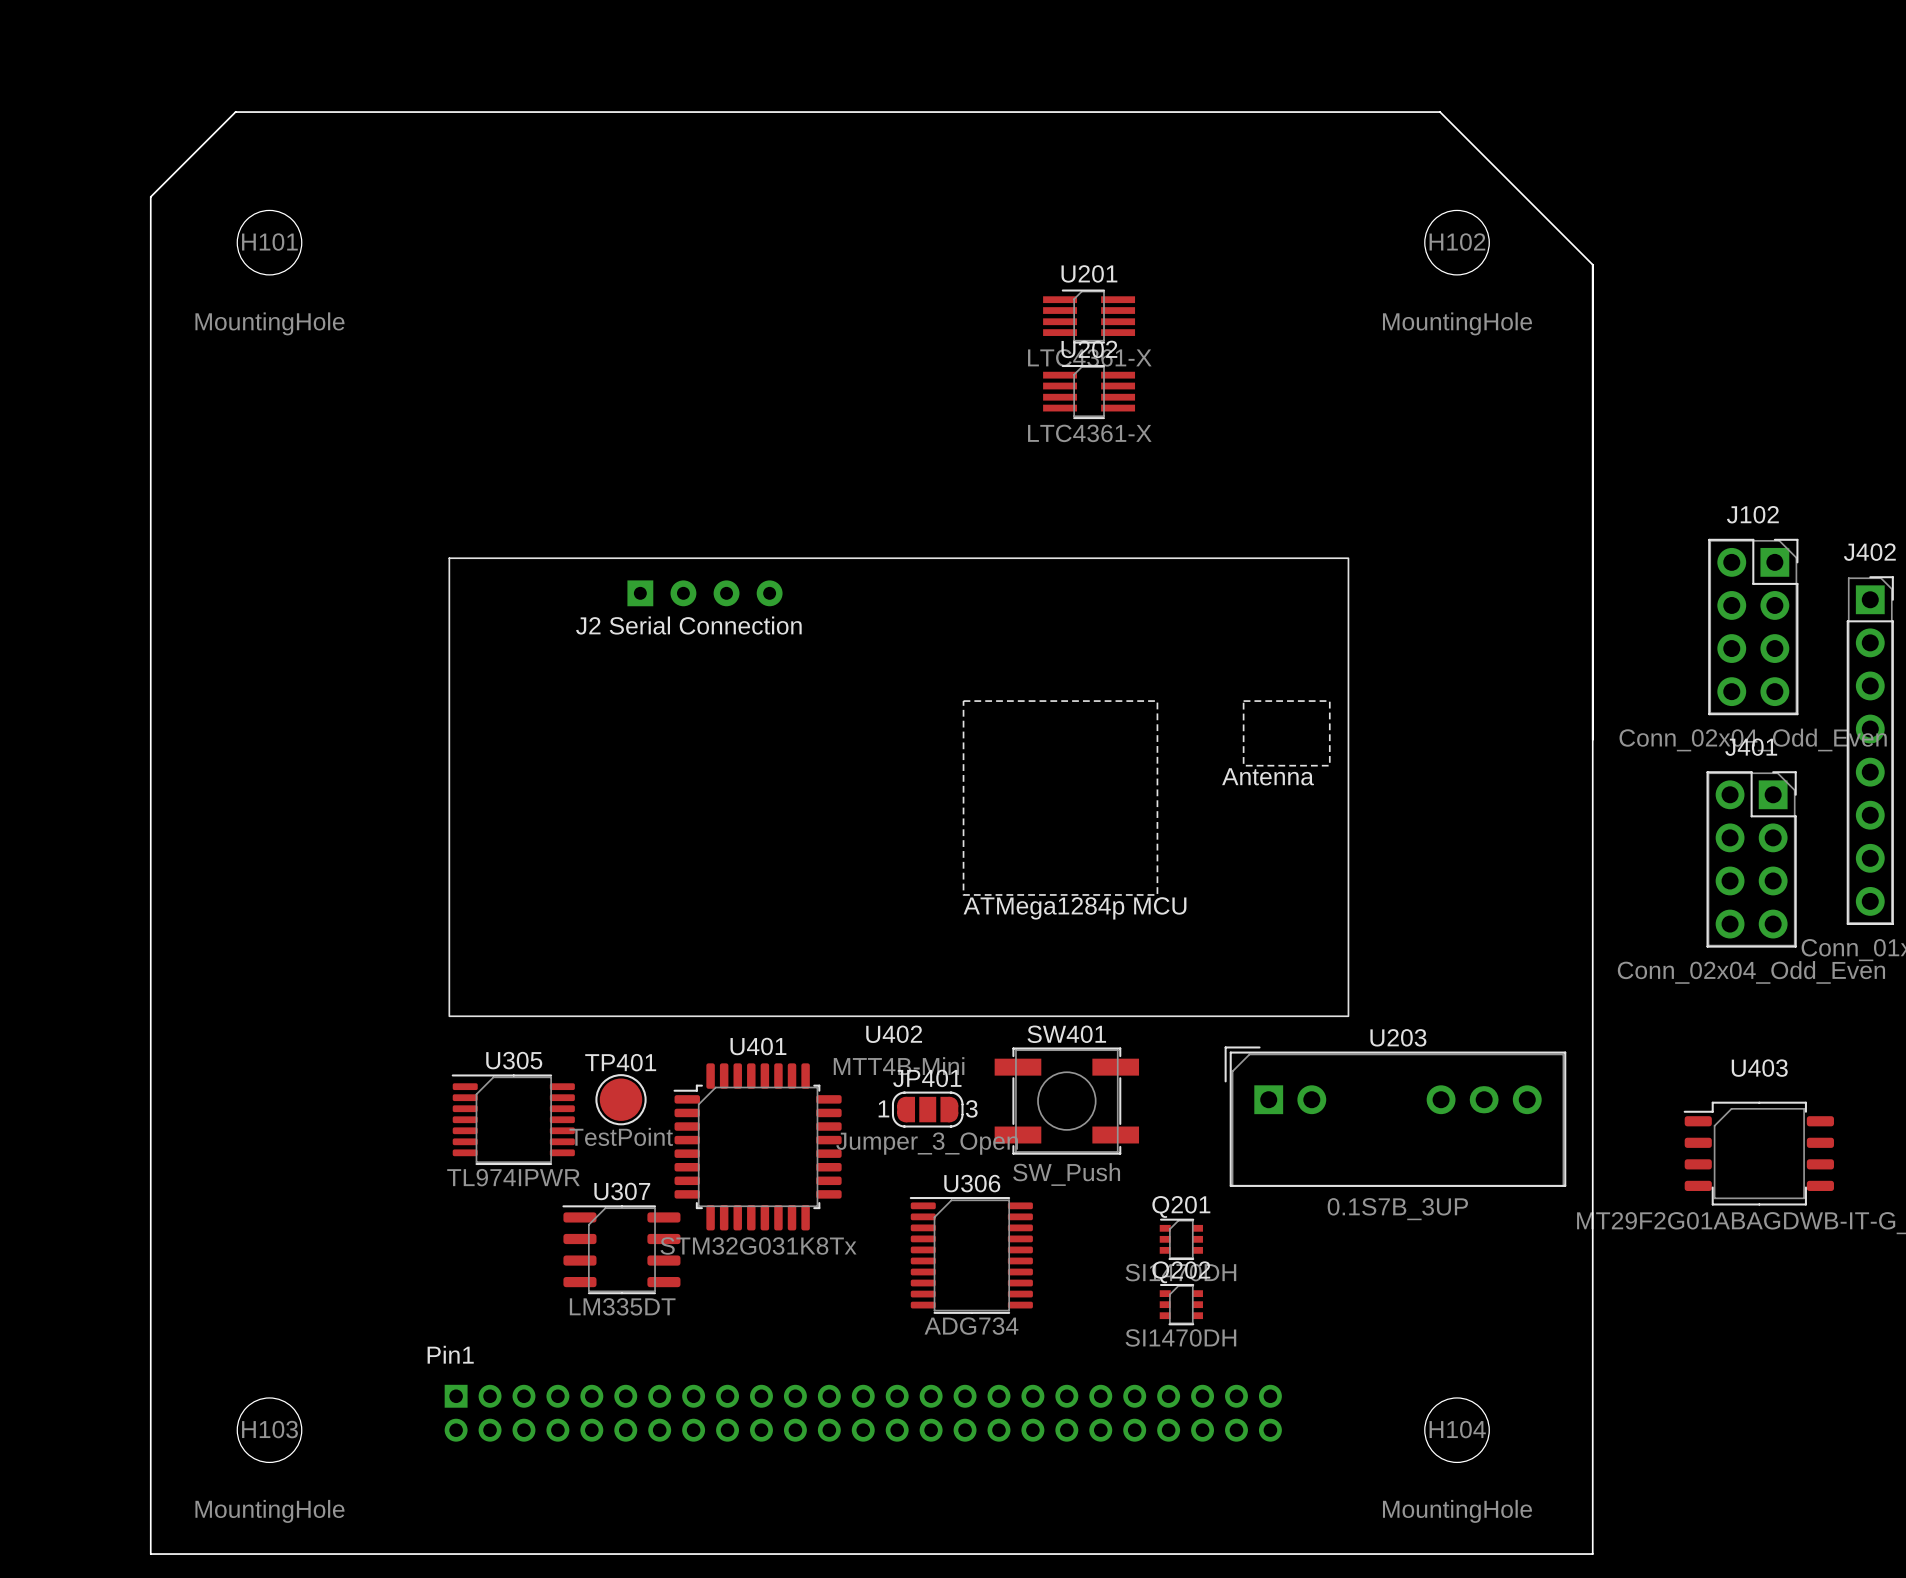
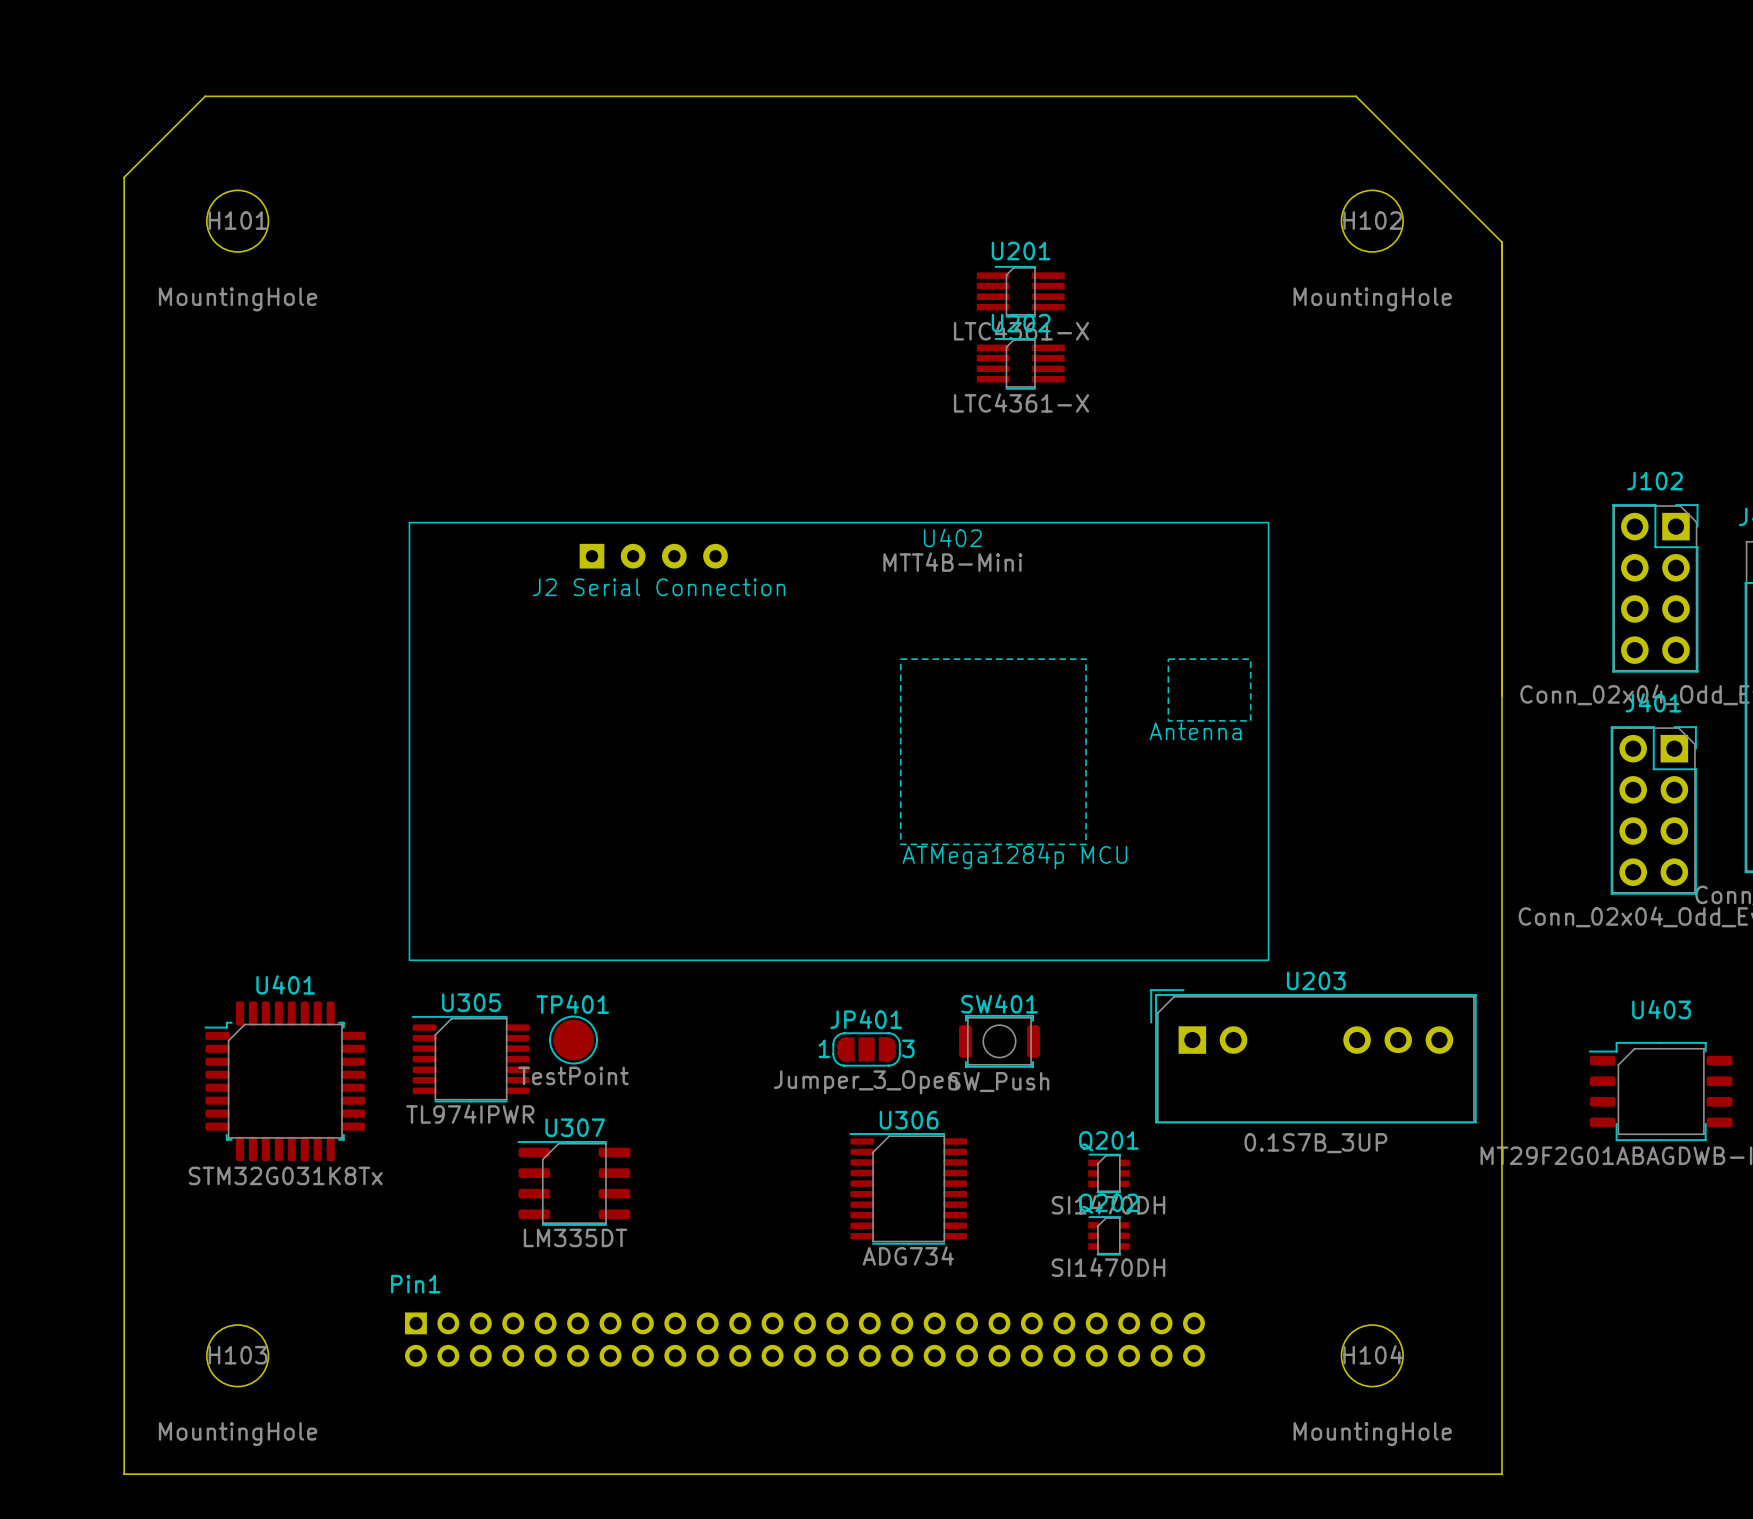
U402 name position: U402 (894, 1034) -> U402 (952, 537)
SW401 footprint: [994, 1047, 1140, 1155] -> [958, 1014, 1041, 1068]
U402 value position: MTT4B-Mini (899, 1066) -> MTT4B-Mini (952, 562)
U401 position: (757, 1146) -> (284, 1081)

